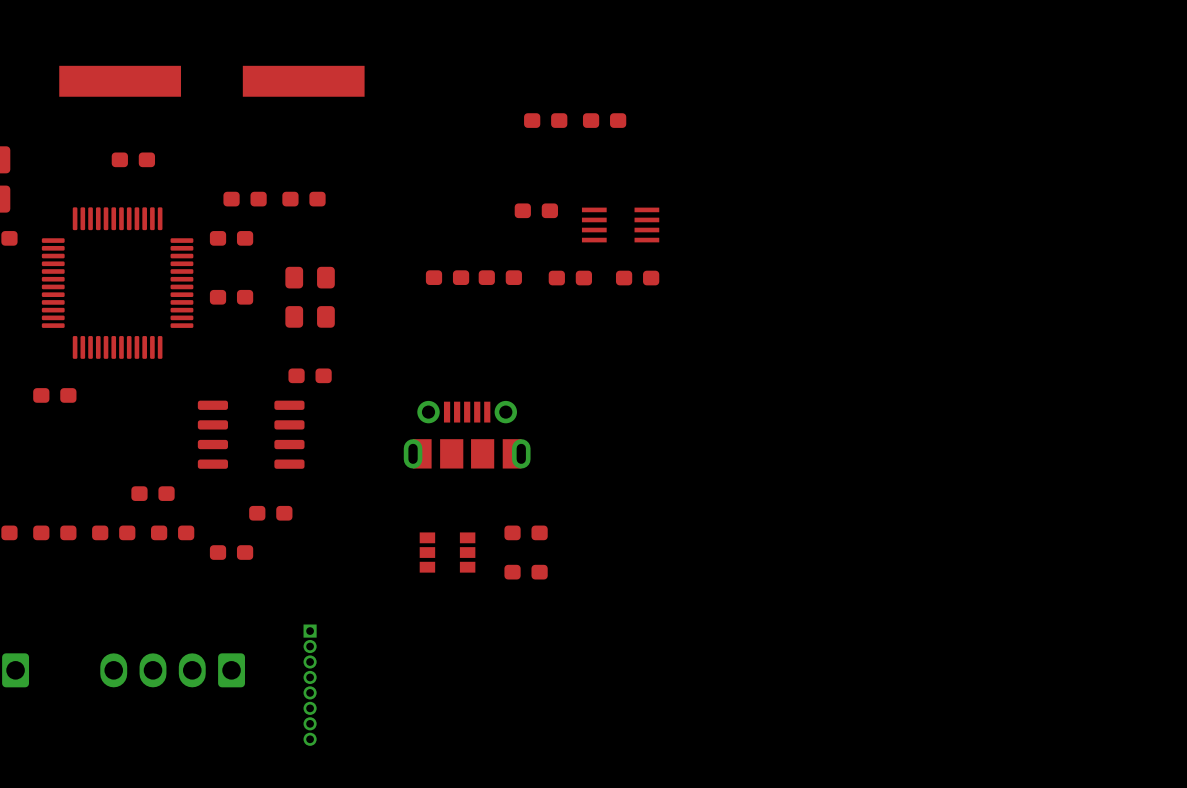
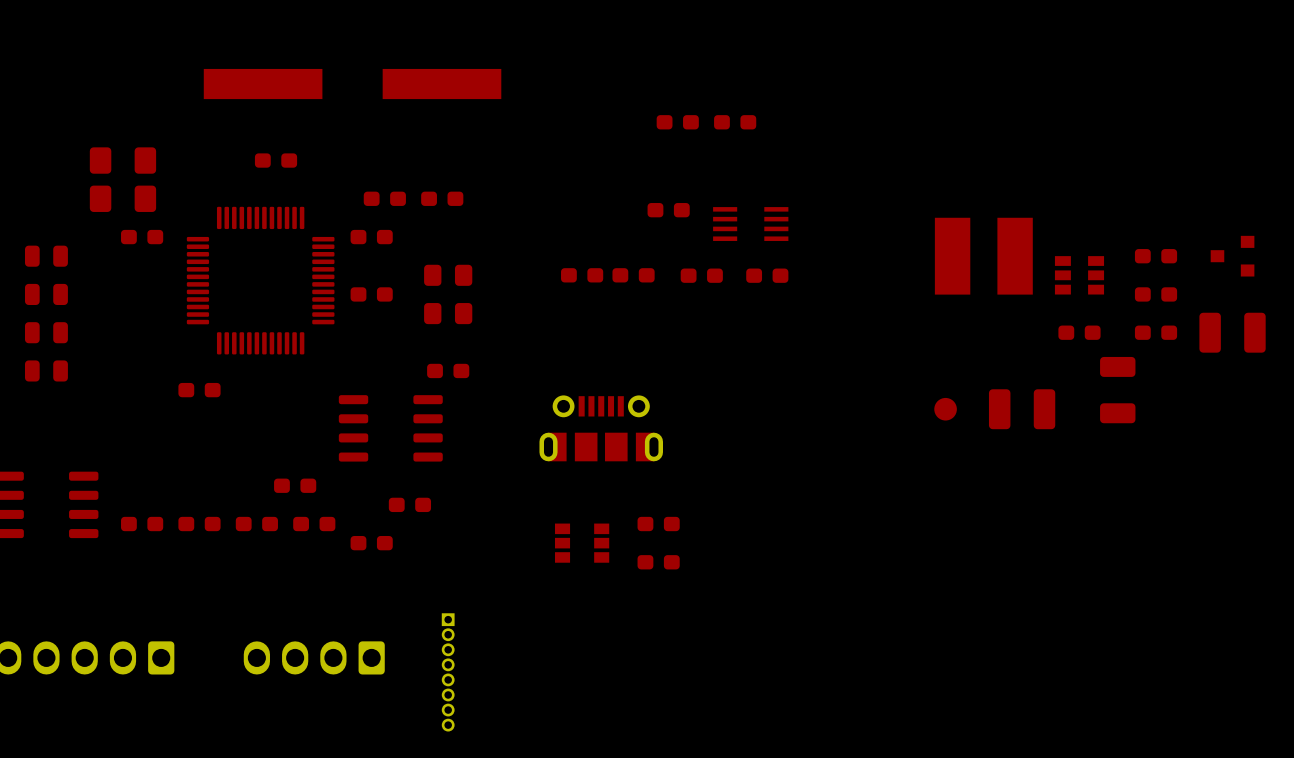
part: none -> (983, 256)
part: none -> (1156, 256)
part: none -> (1232, 256)
part: none -> (1079, 275)
part: none -> (1156, 294)
part: none -> (1079, 332)
part: none -> (1156, 332)
part: none -> (1232, 332)
part: none -> (1117, 390)
part: none -> (945, 409)
part: none -> (1022, 409)

